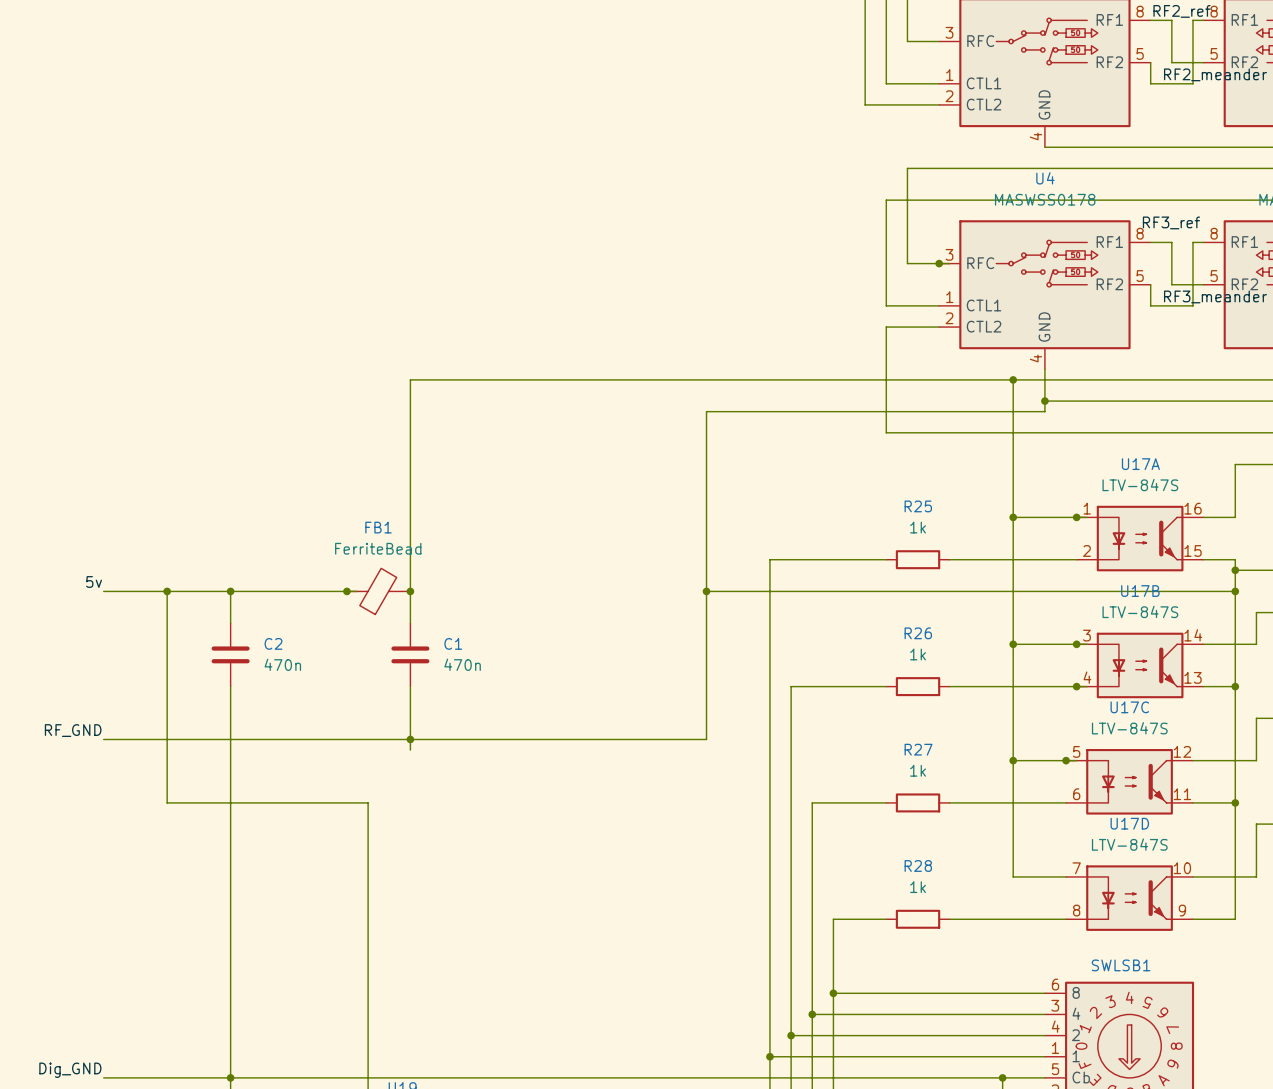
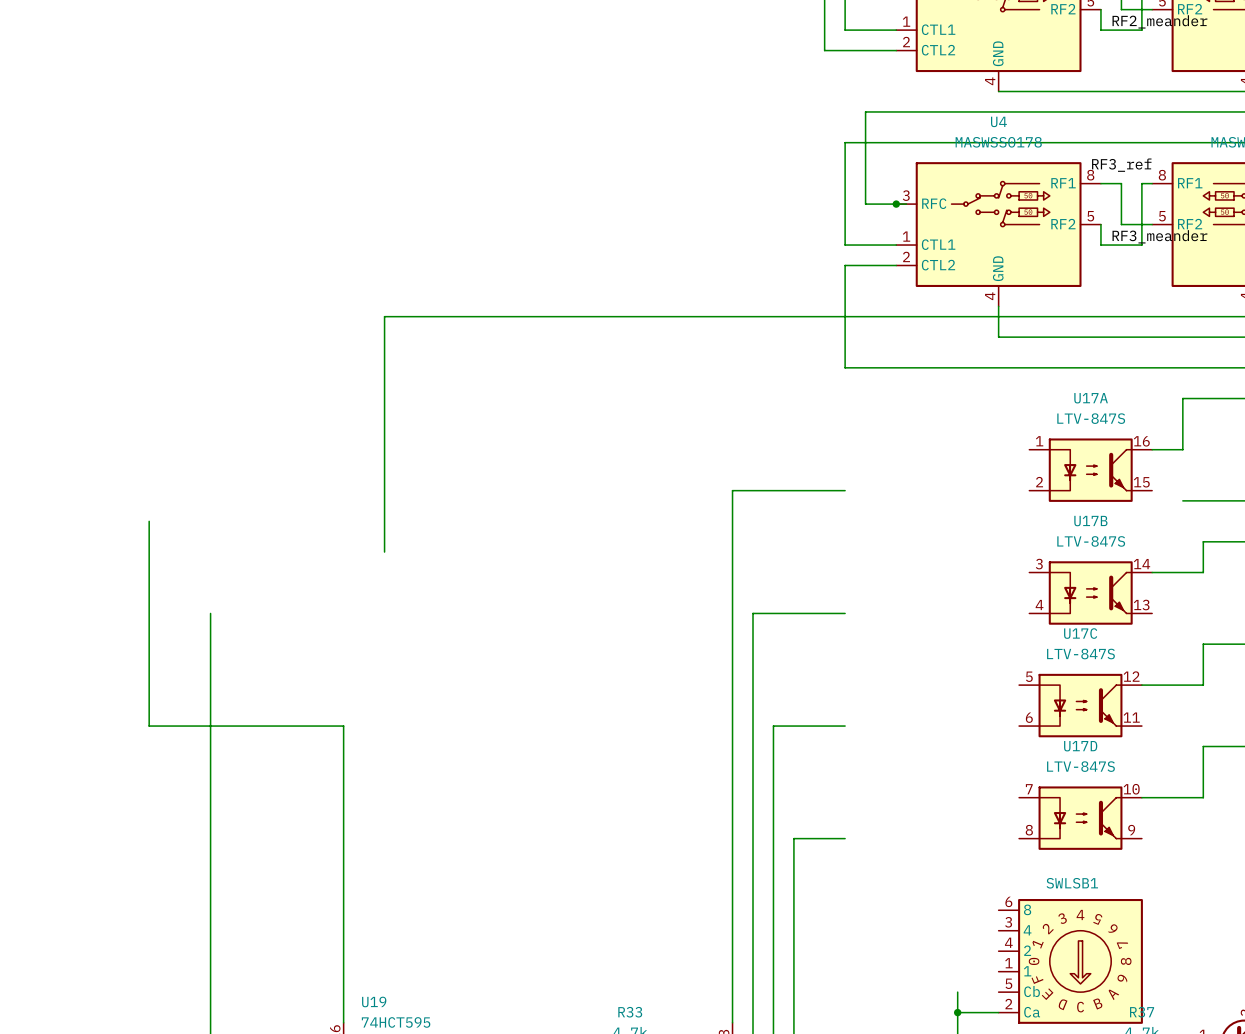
wire: (1013, 379) (1013, 876) (1066, 876) -> none
junction: (1013, 379) -> none
wire: (1044, 401) (1044, 411) (706, 411) (706, 739) (103, 739) -> none
junction: (1044, 401) -> none
wire: (1013, 517) (1087, 517) -> none
junction: (1013, 517) -> none
junction: (1076, 517) -> none
R25: 1k (918, 559) -> none
wire: (949, 559) (1076, 559) -> none
wire: (1203, 559) (1235, 559) (1235, 919) (1192, 919) -> none
junction: (1235, 570) -> none
label: 5v (94, 581) -> none
wire: (103, 591) (356, 591) -> none
junction: (167, 591) -> none
wire: (230, 591) (230, 623) -> none
junction: (230, 591) -> none
junction: (346, 591) -> none
FB1: FerriteBead (378, 591) -> none
junction: (410, 591) -> none
wire: (706, 591) (1235, 591) -> none
junction: (706, 591) -> none
junction: (1235, 591) -> none
wire: (1013, 644) (1087, 644) -> none
junction: (1013, 644) -> none
junction: (1076, 644) -> none
C2: 470n (230, 654) -> none
C1: 470n (410, 654) -> none
wire: (410, 686) (410, 750) -> none
R26: 1k (918, 686) -> none
wire: (949, 686) (1087, 686) -> none
junction: (1076, 686) -> none
wire: (1203, 686) (1235, 686) -> none
junction: (1235, 686) -> none
label: RF_GND (73, 730) -> none
junction: (410, 739) -> none
wire: (1013, 760) (1076, 760) -> none
junction: (1013, 760) -> none
junction: (1066, 760) -> none
R27: 1k (918, 802) -> none
wire: (949, 802) (1066, 802) -> none
wire: (1192, 802) (1235, 802) -> none
junction: (1235, 802) -> none
R28: 1k (918, 919) -> none
wire: (949, 919) (1066, 919) -> none
wire: (833, 993) (1044, 993) -> none
junction: (833, 993) -> none
wire: (812, 1014) (1044, 1014) -> none
junction: (812, 1014) -> none
wire: (791, 1035) (1044, 1035) -> none
junction: (791, 1035) -> none
wire: (769, 1056) (1044, 1056) -> none
junction: (769, 1056) -> none
label: Dig_GND (70, 1070) -> none
wire: (103, 1077) (1044, 1077) -> none
junction: (230, 1077) -> none
junction: (1002, 1077) -> none

